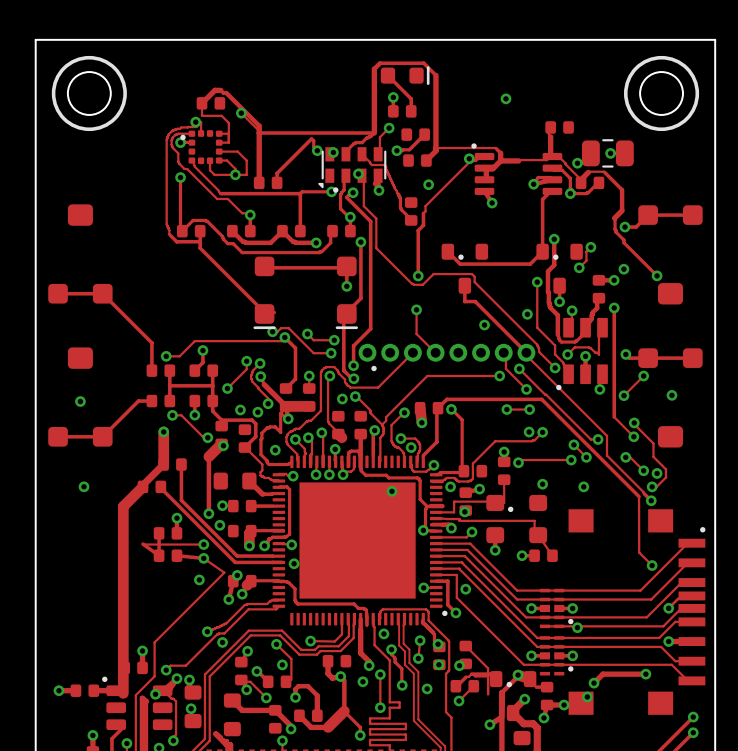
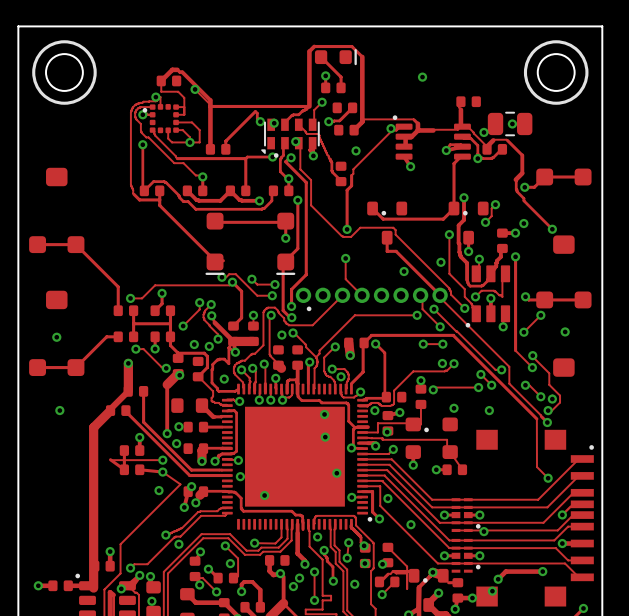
via: none -> (325, 437)
via: none -> (336, 473)
via: none -> (264, 495)
via: none -> (410, 524)
via: none -> (293, 586)

